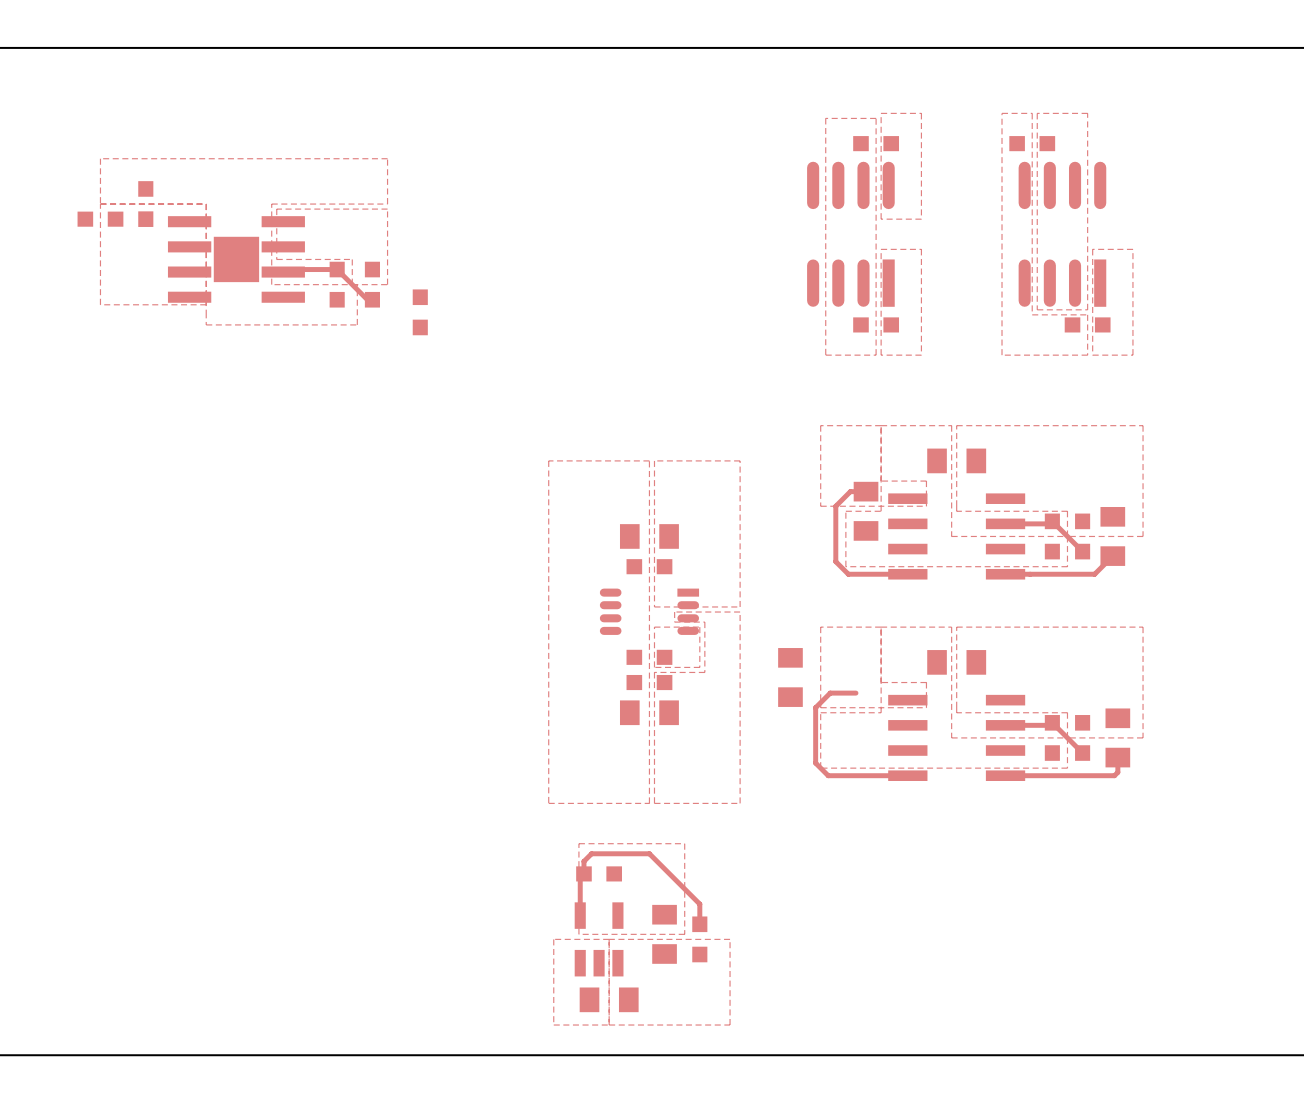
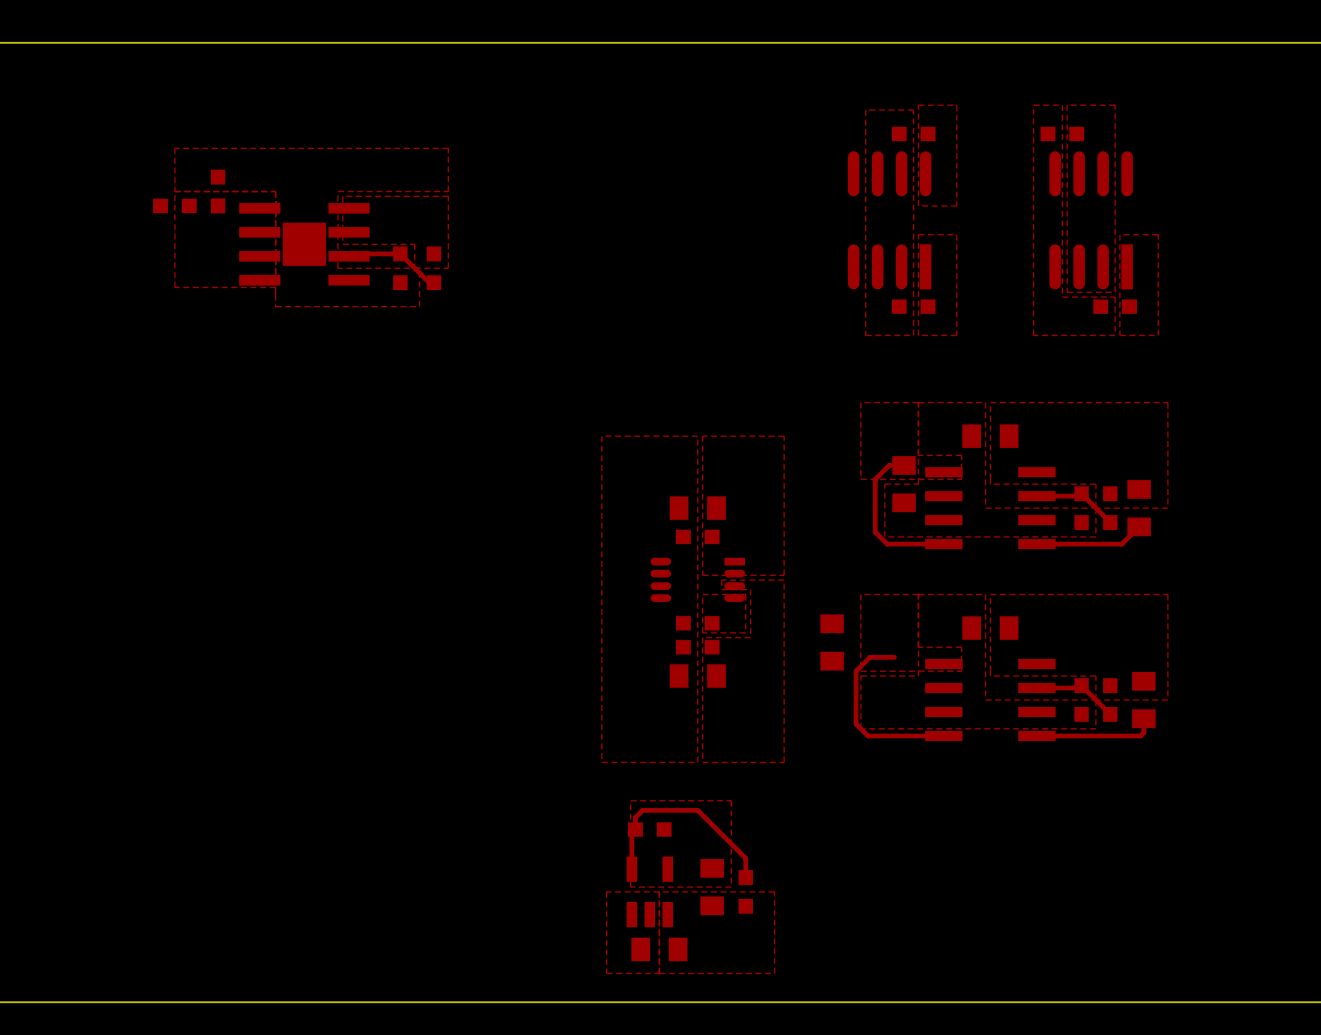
part: (420, 312) -> none

